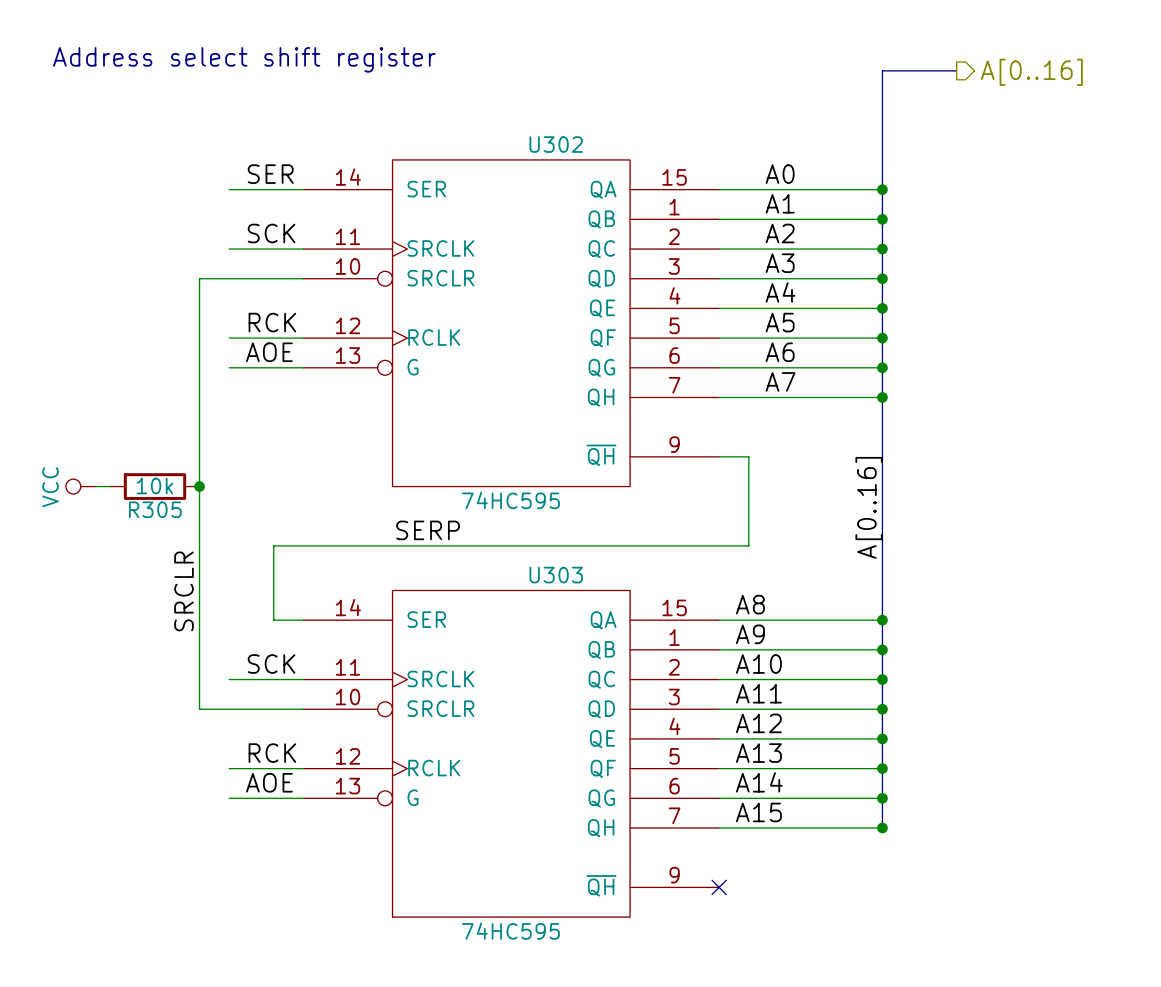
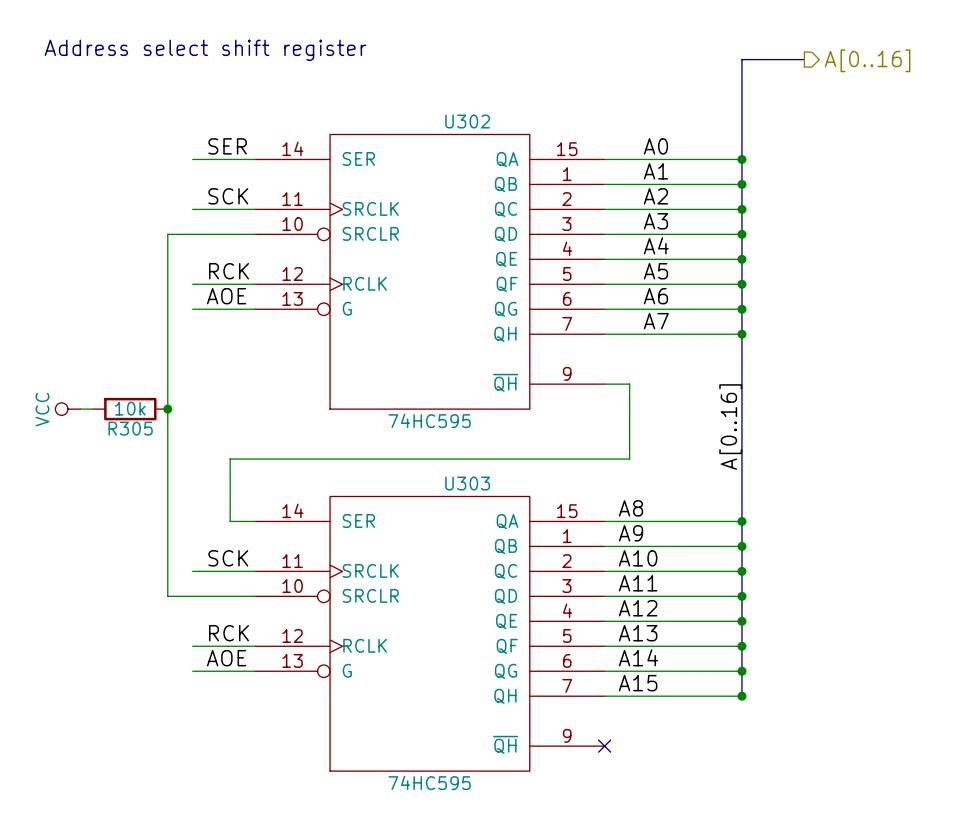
label: SERP (428, 530) -> none
label: SRCLR (183, 591) -> none

